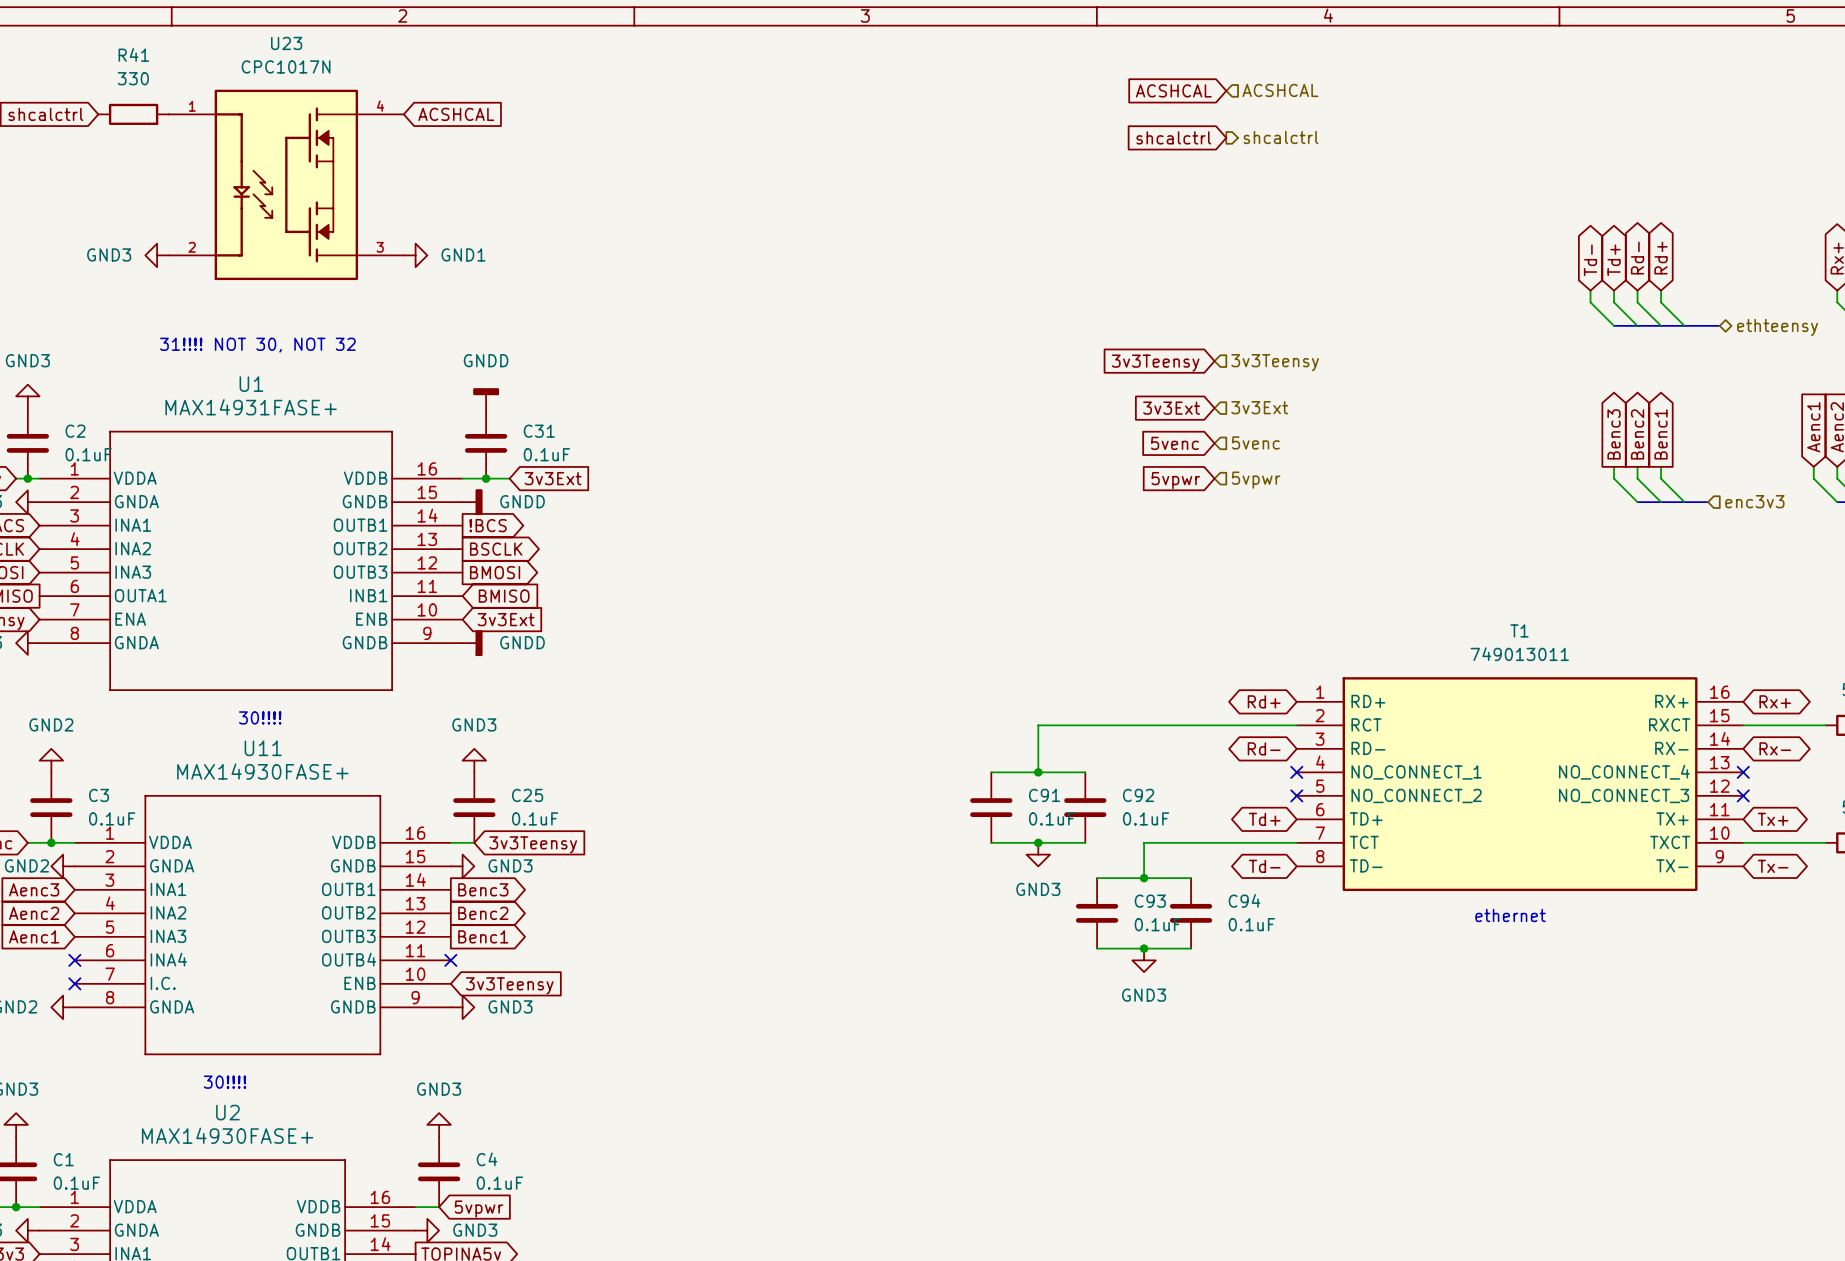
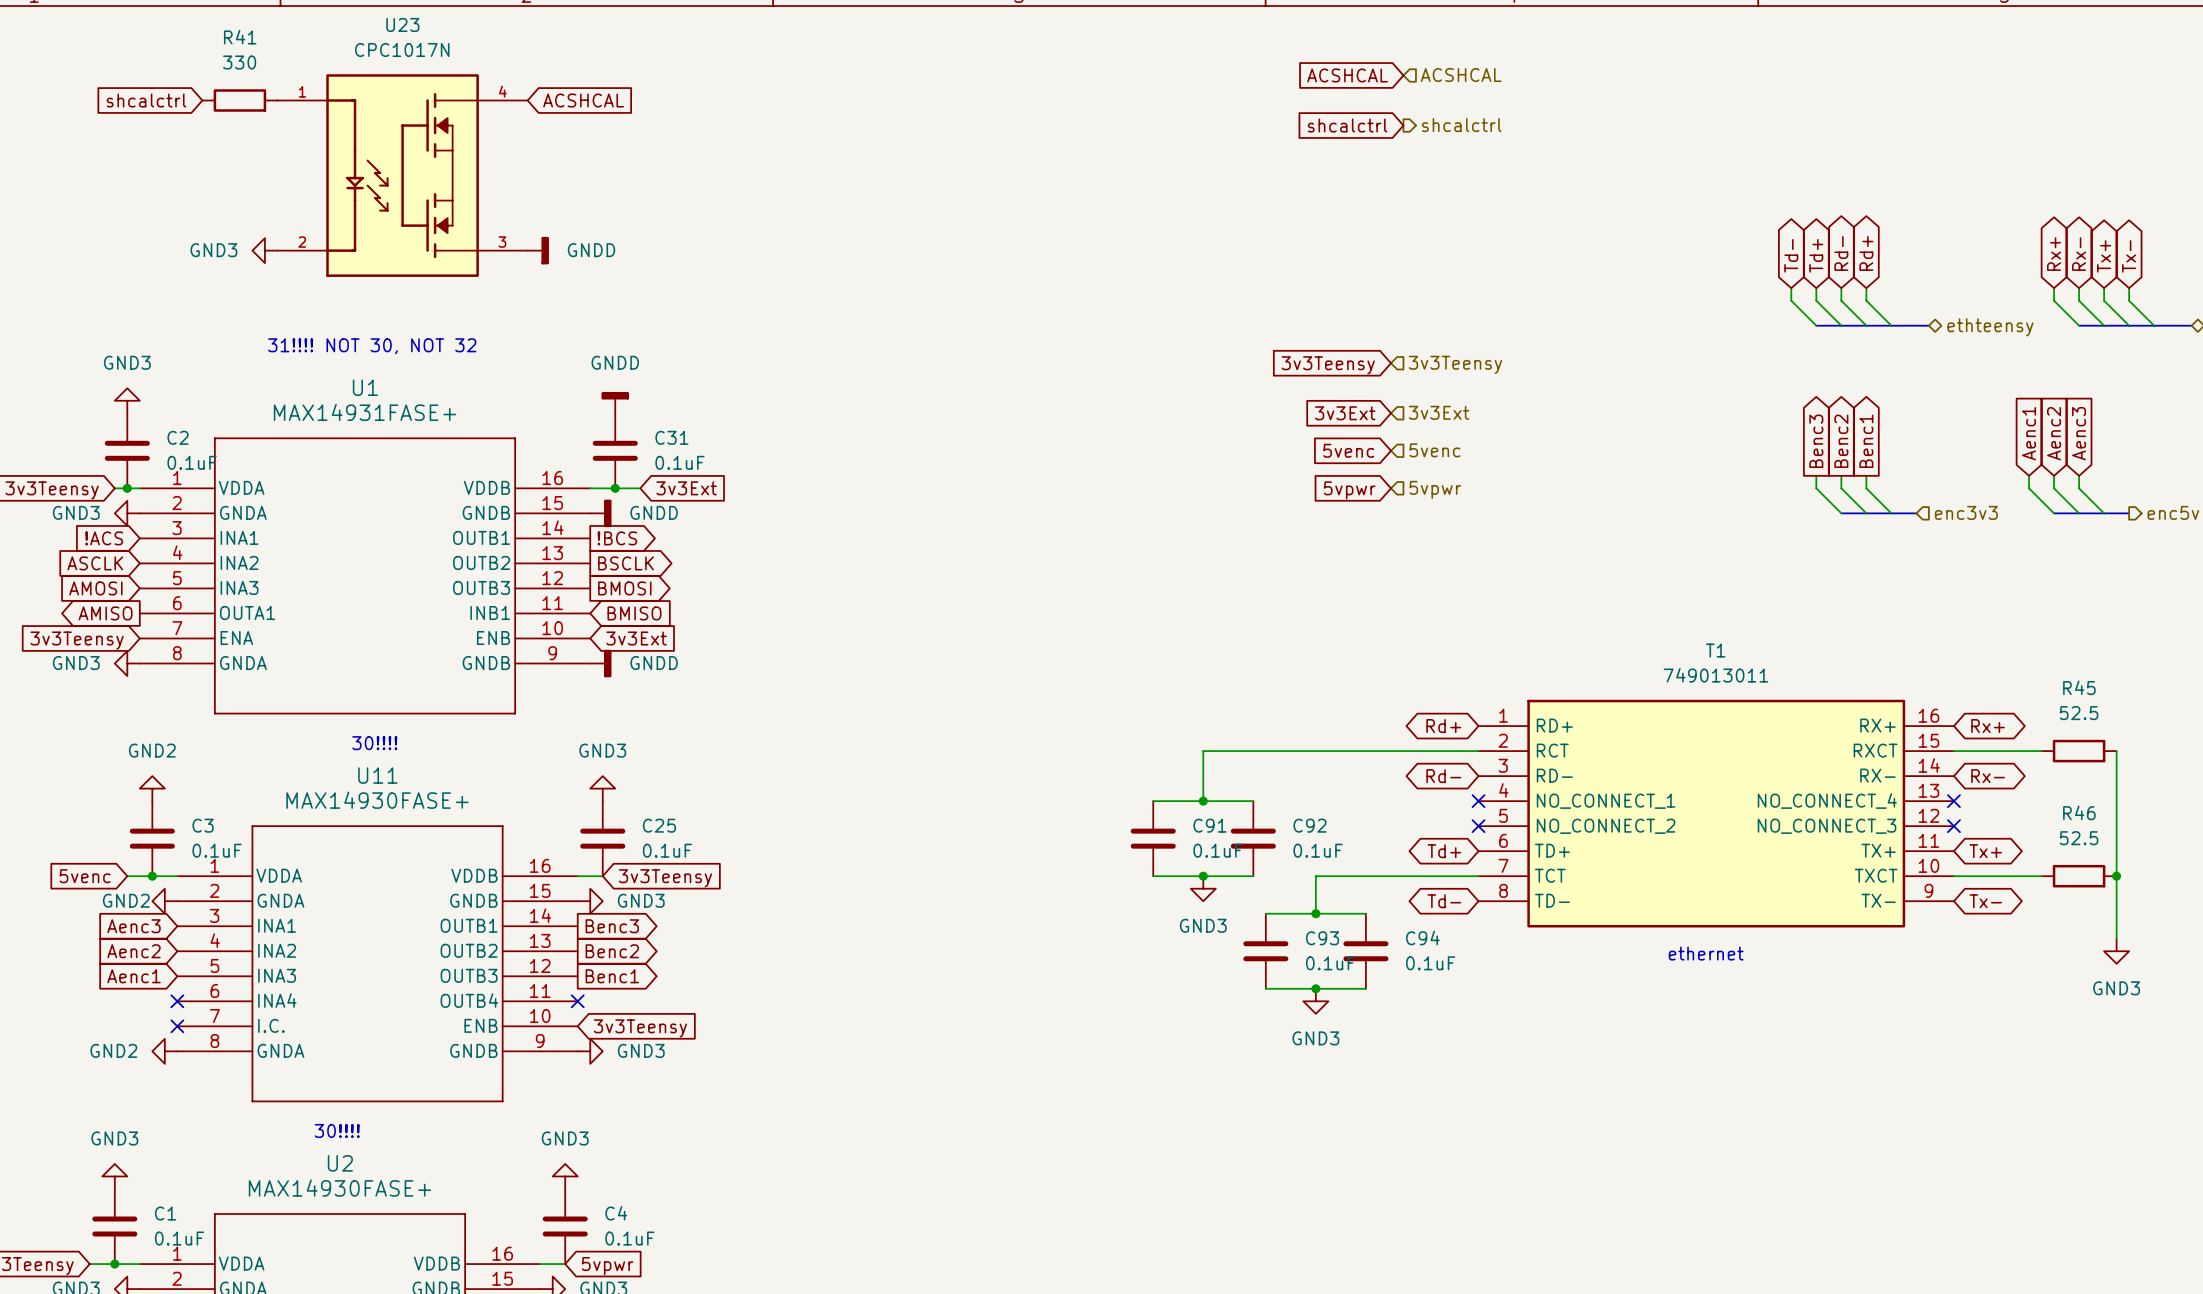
power symbol: GND1 (415, 255) -> GNDD (538, 250)

